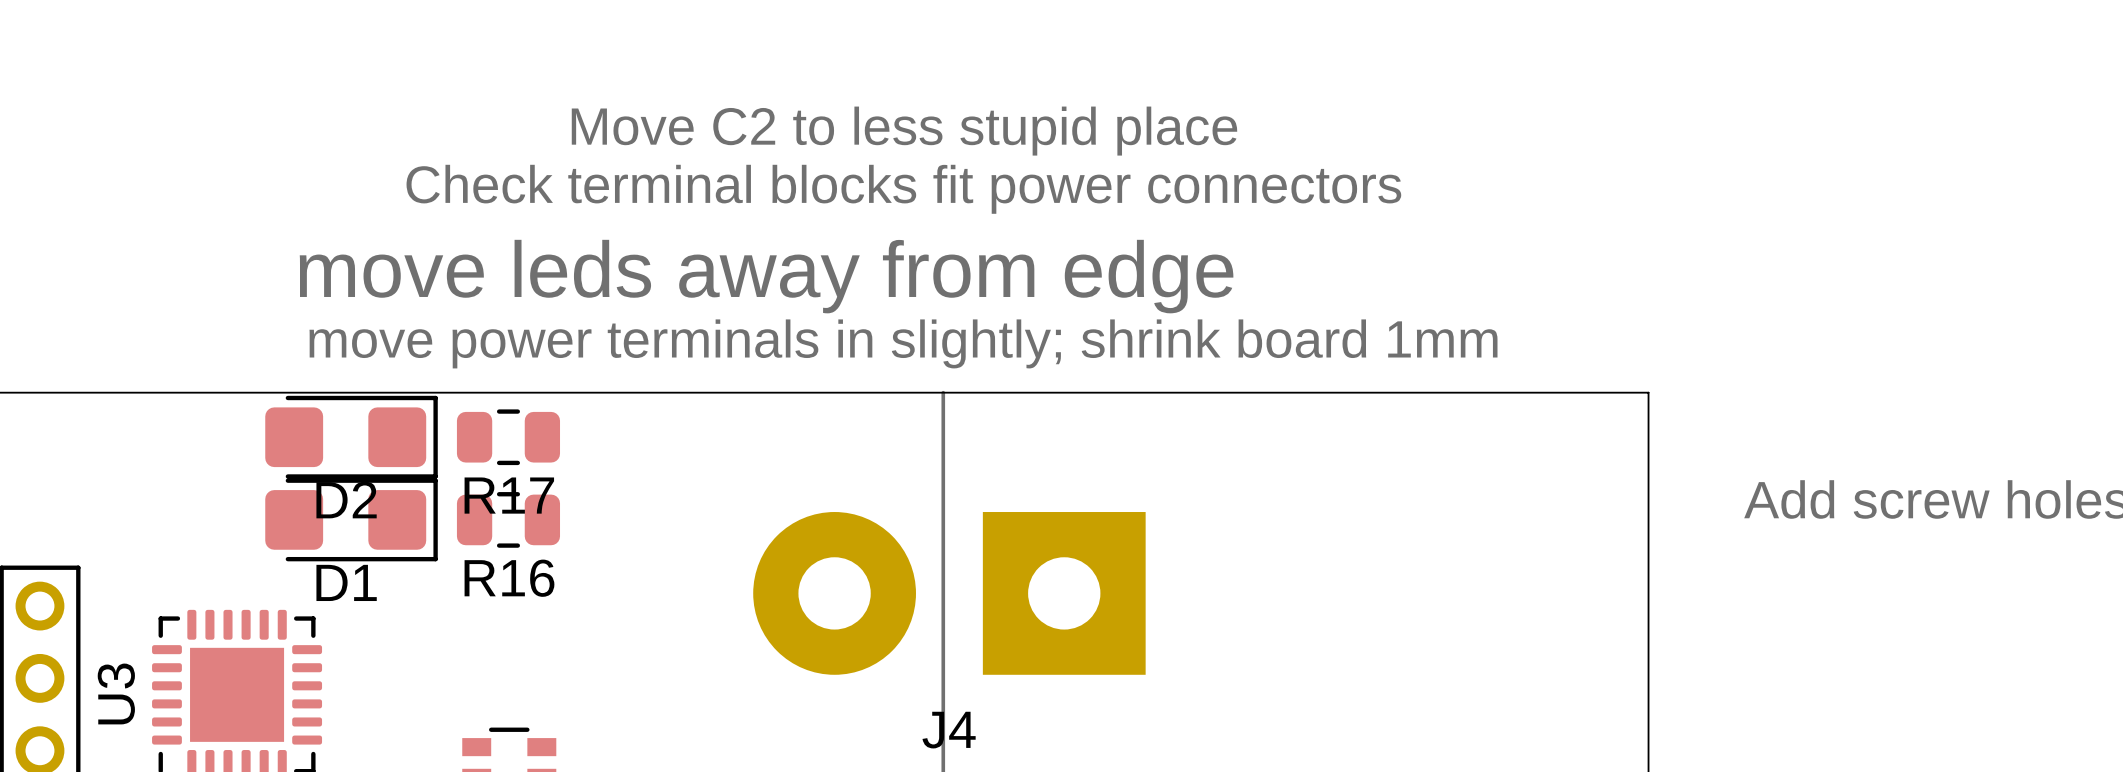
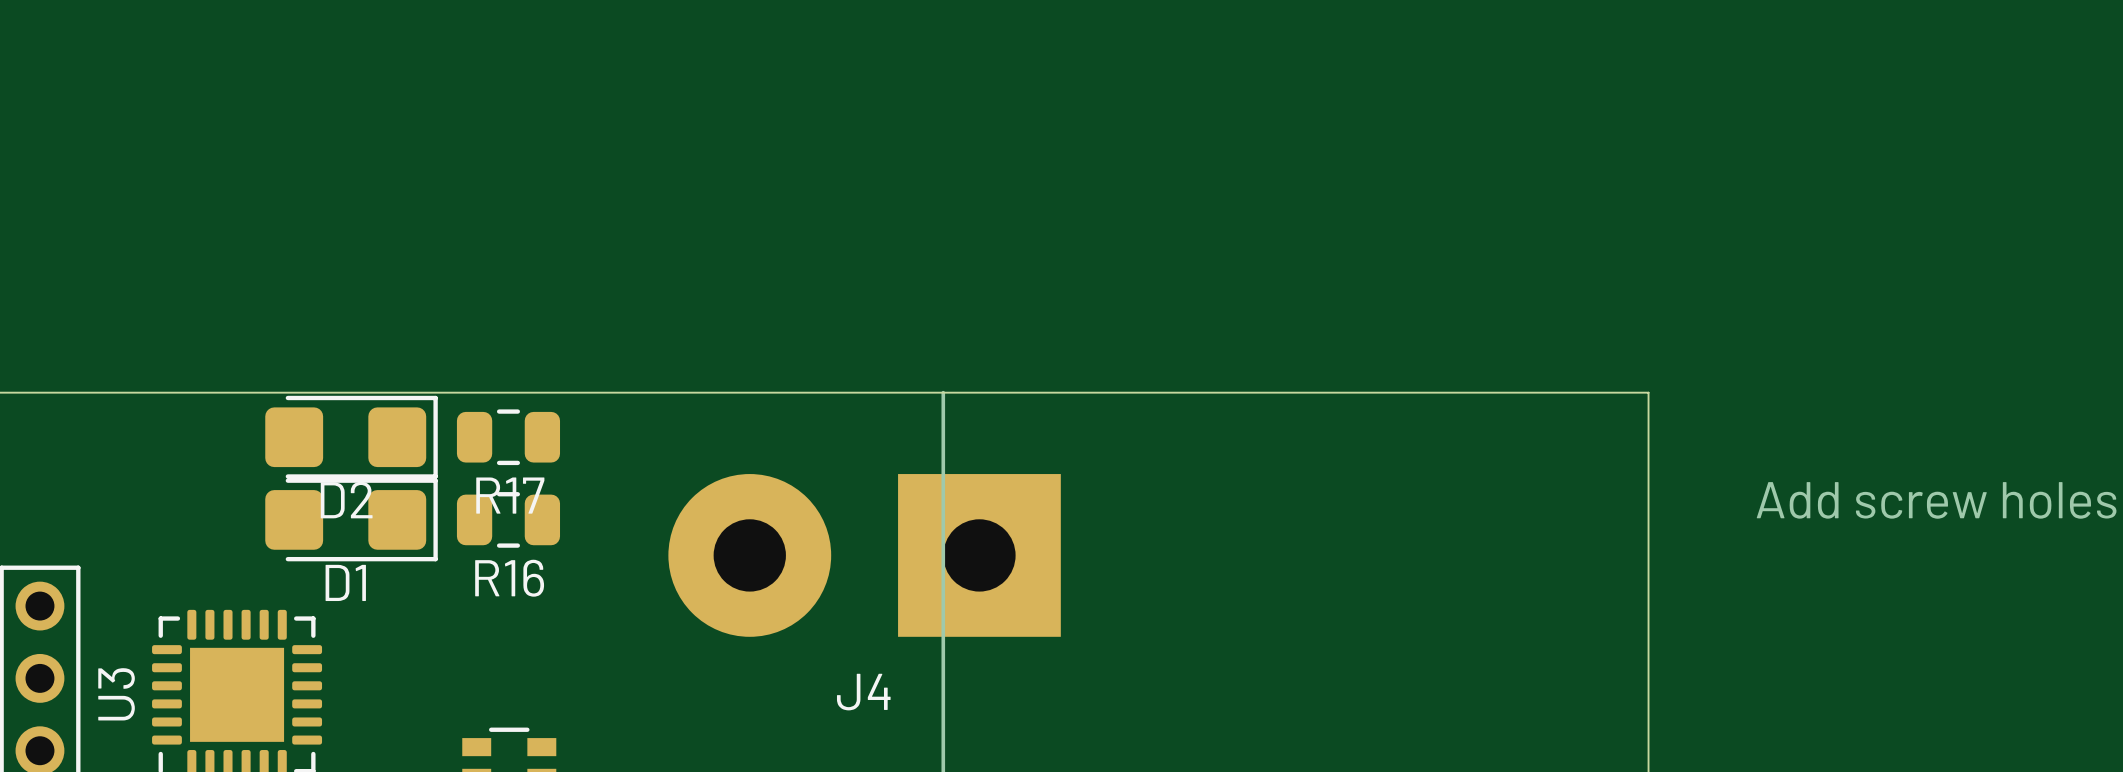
text: Move C2 to less stupid place (904, 131) -> none
text: Check terminal blocks fit power connectors (903, 189) -> none
text: move leds away from edge (766, 276) -> none
text: move power terminals in slightly; shrink board 1mm (903, 343) -> none
J4 position: (949, 593) -> (864, 555)

